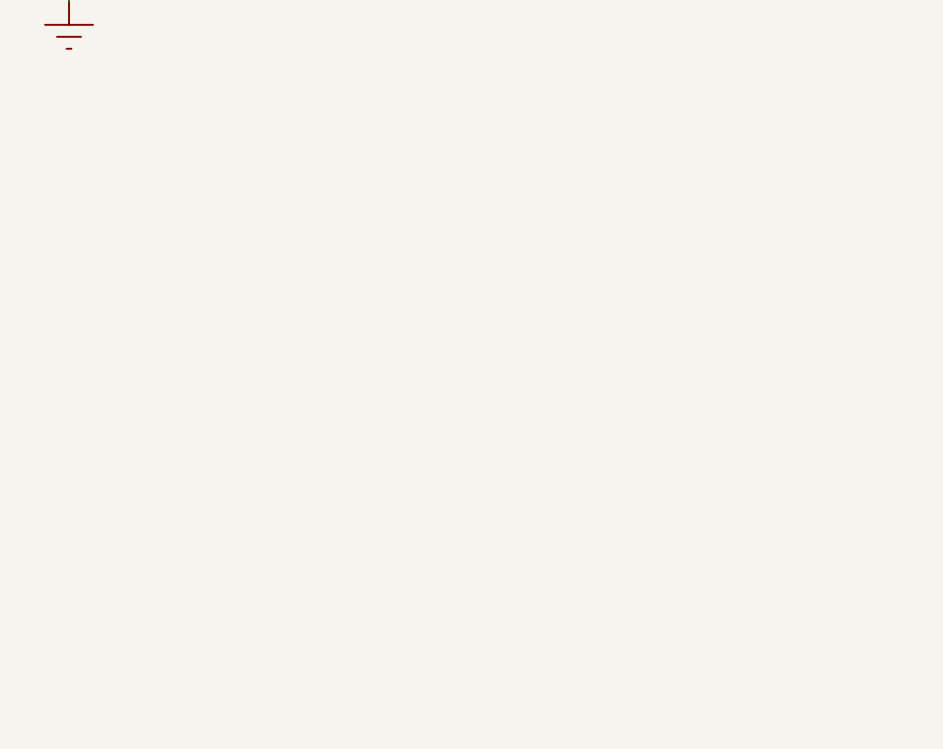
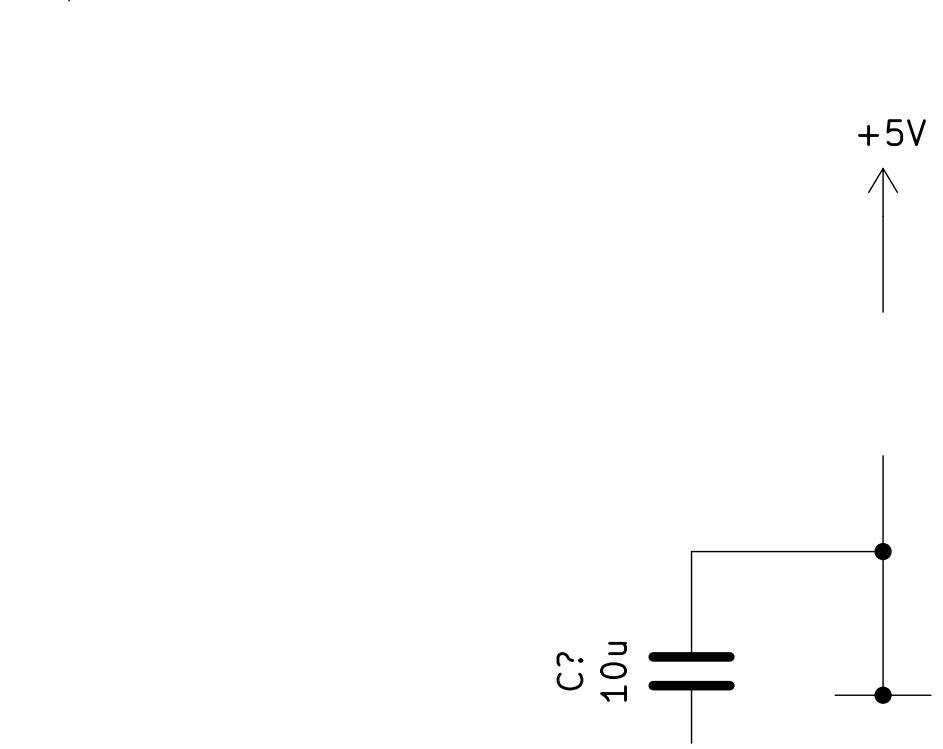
power symbol: (69, 24) -> none
power symbol: none -> +5V (883, 192)
wire: none -> (883, 216) (883, 312)
wire: none -> (883, 455) (883, 695)
wire: none -> (883, 551) (691, 551) (691, 599)
junction: none -> (883, 551)
C?: none -> 10u (691, 671)
wire: none -> (835, 695) (930, 695)
junction: none -> (883, 695)

